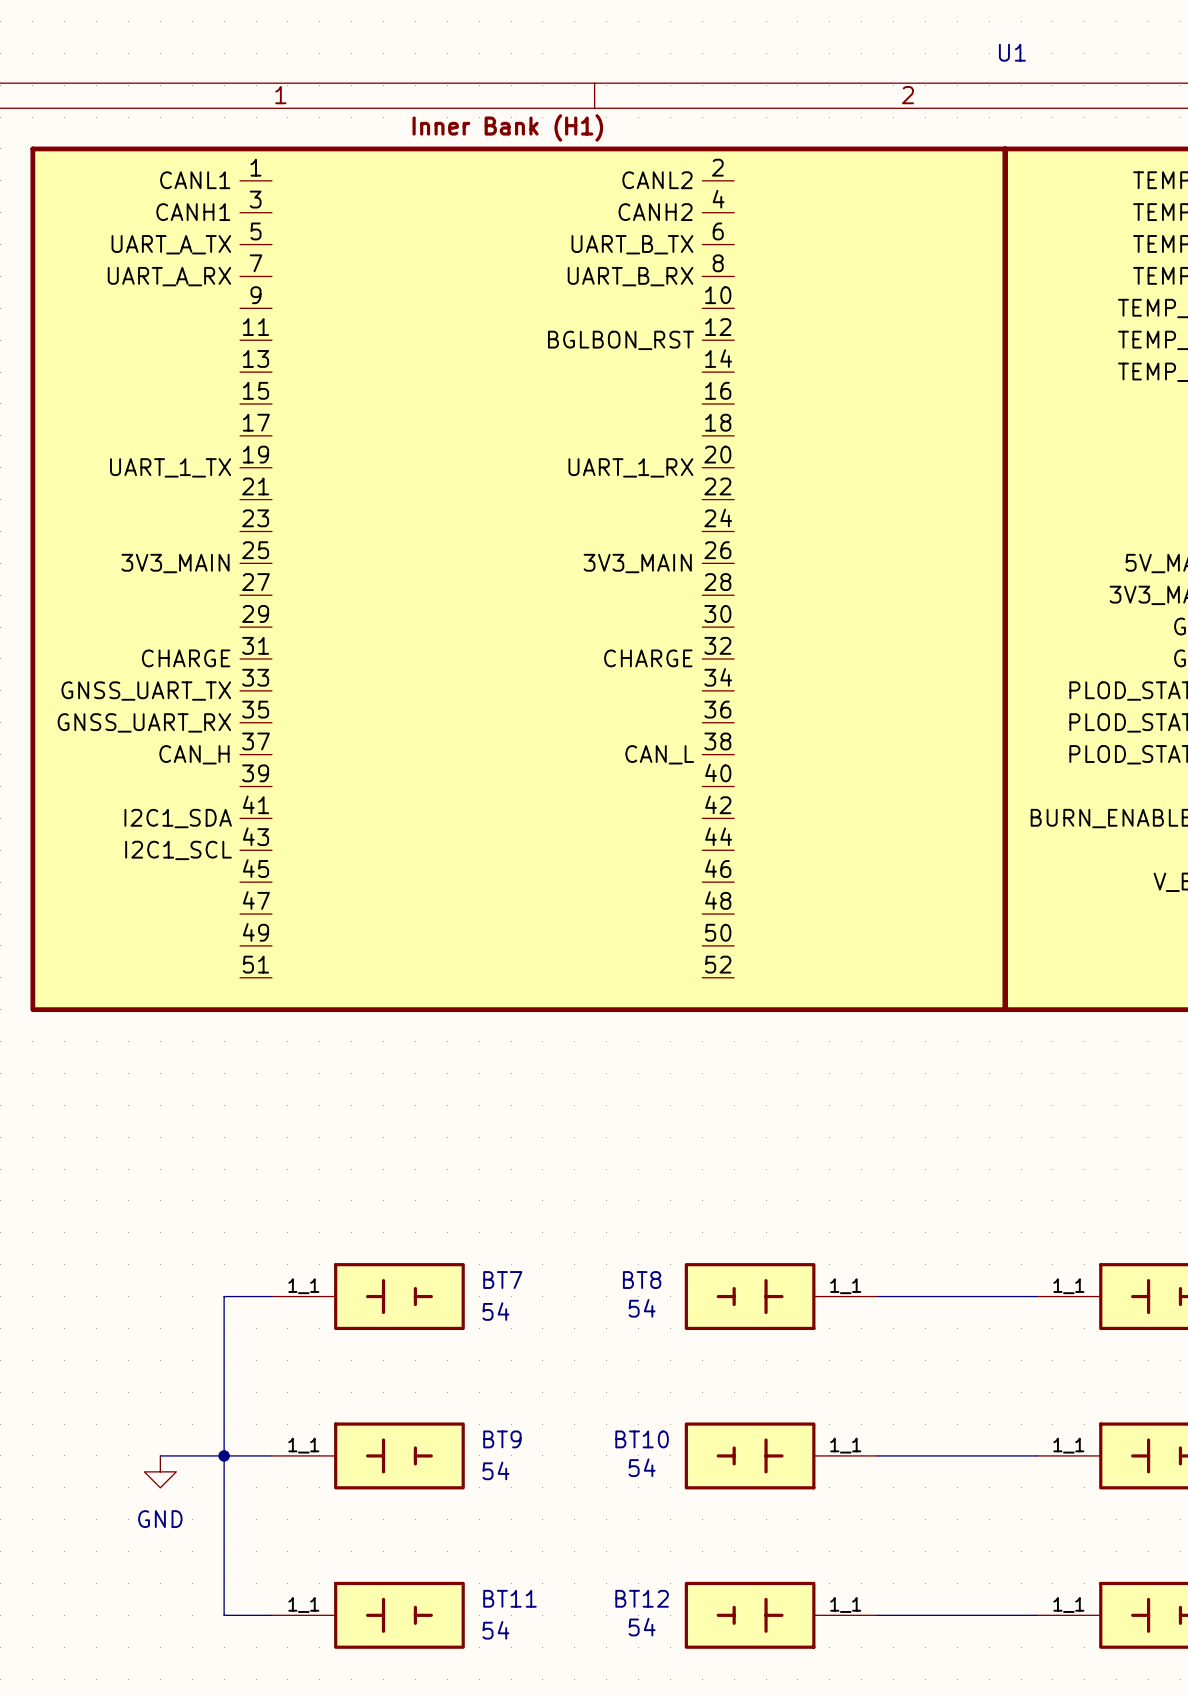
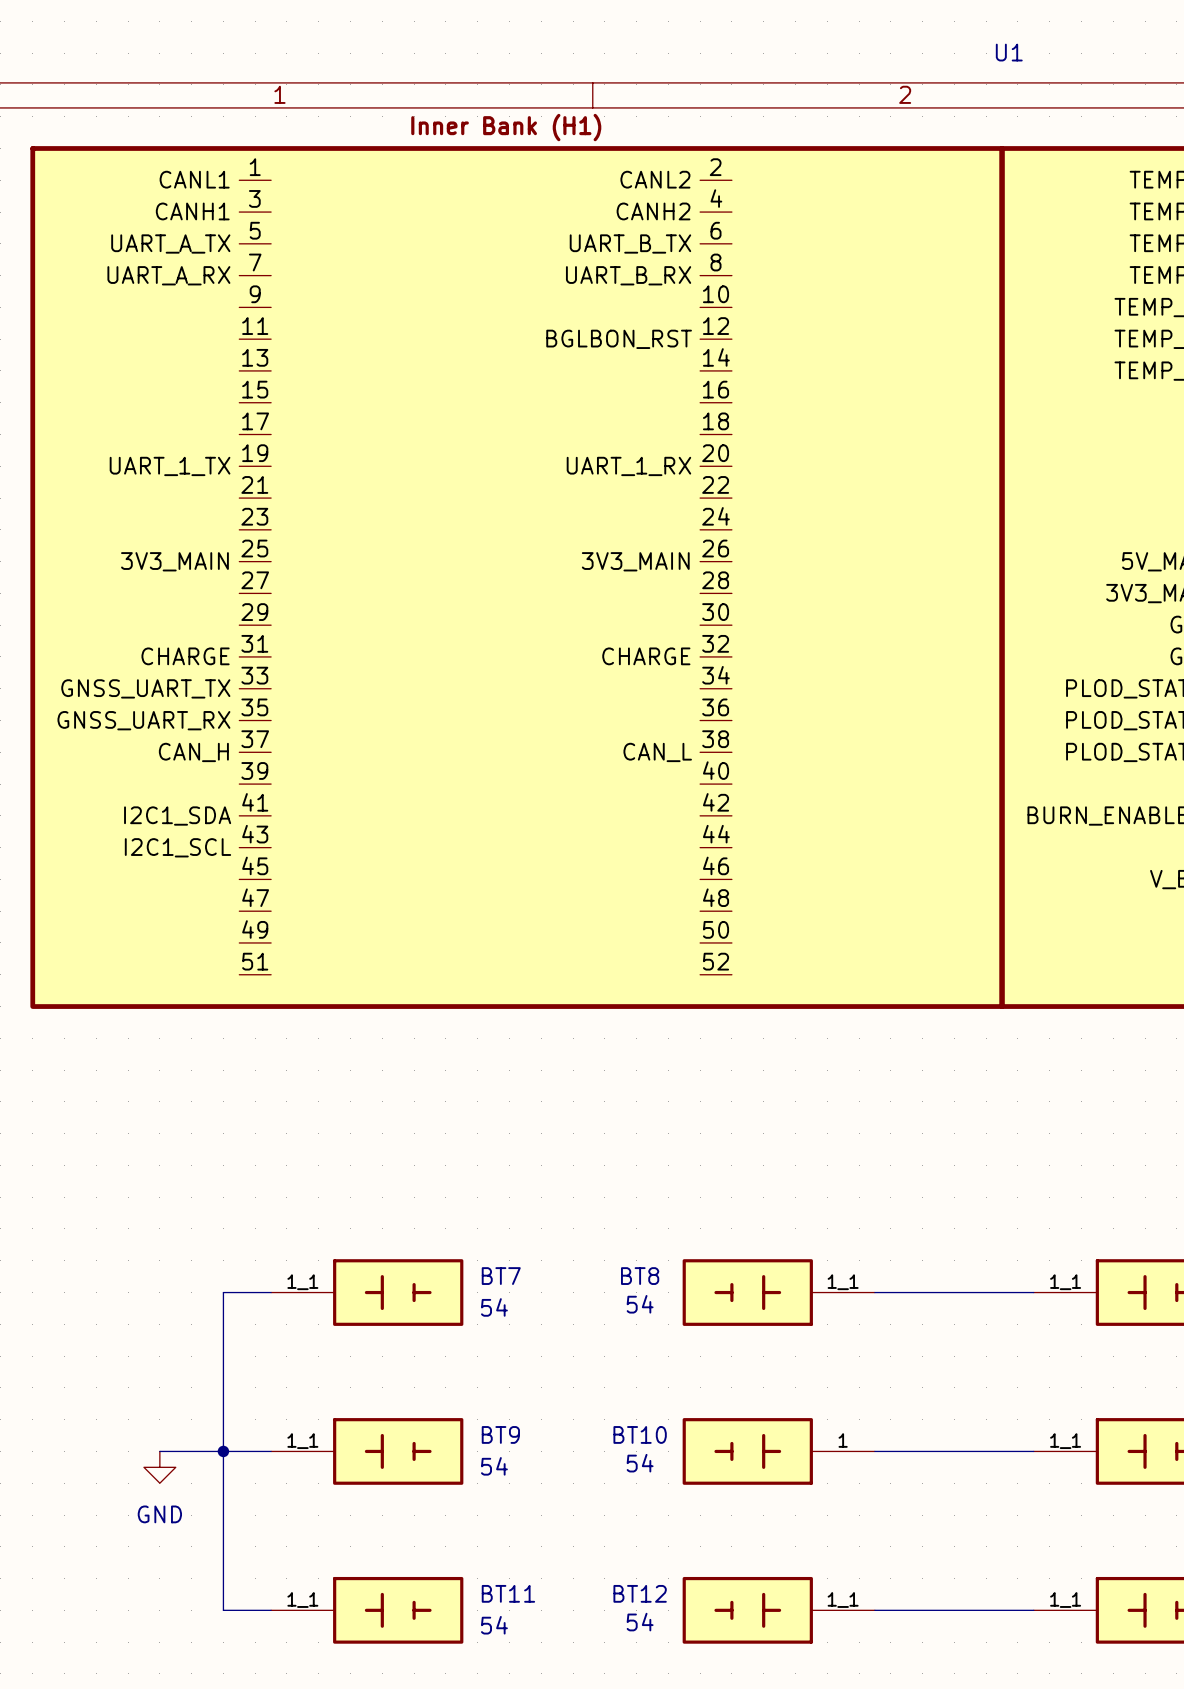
BT10 pin number: 1_1 (845, 1445) -> 1 (843, 1440)

